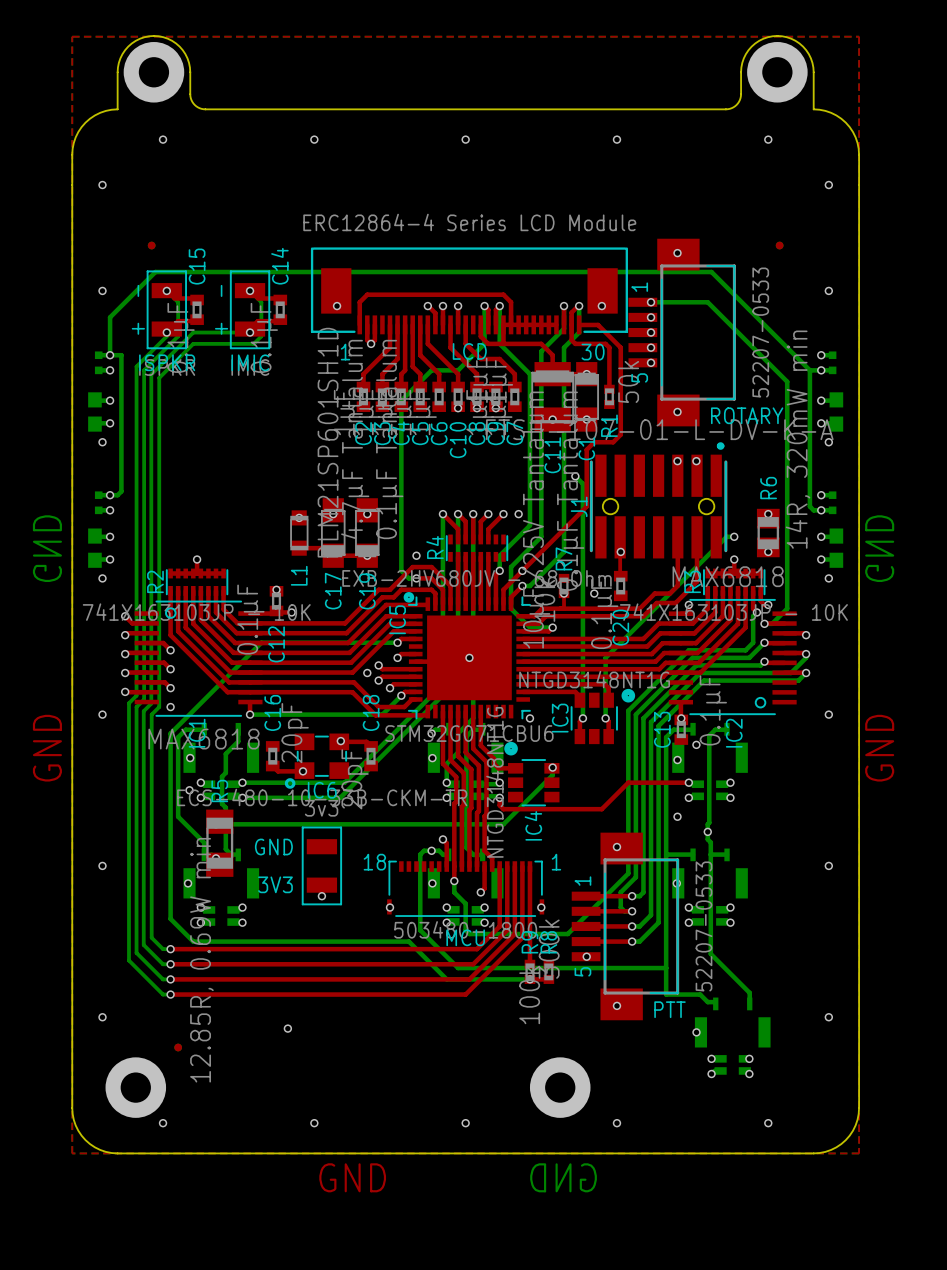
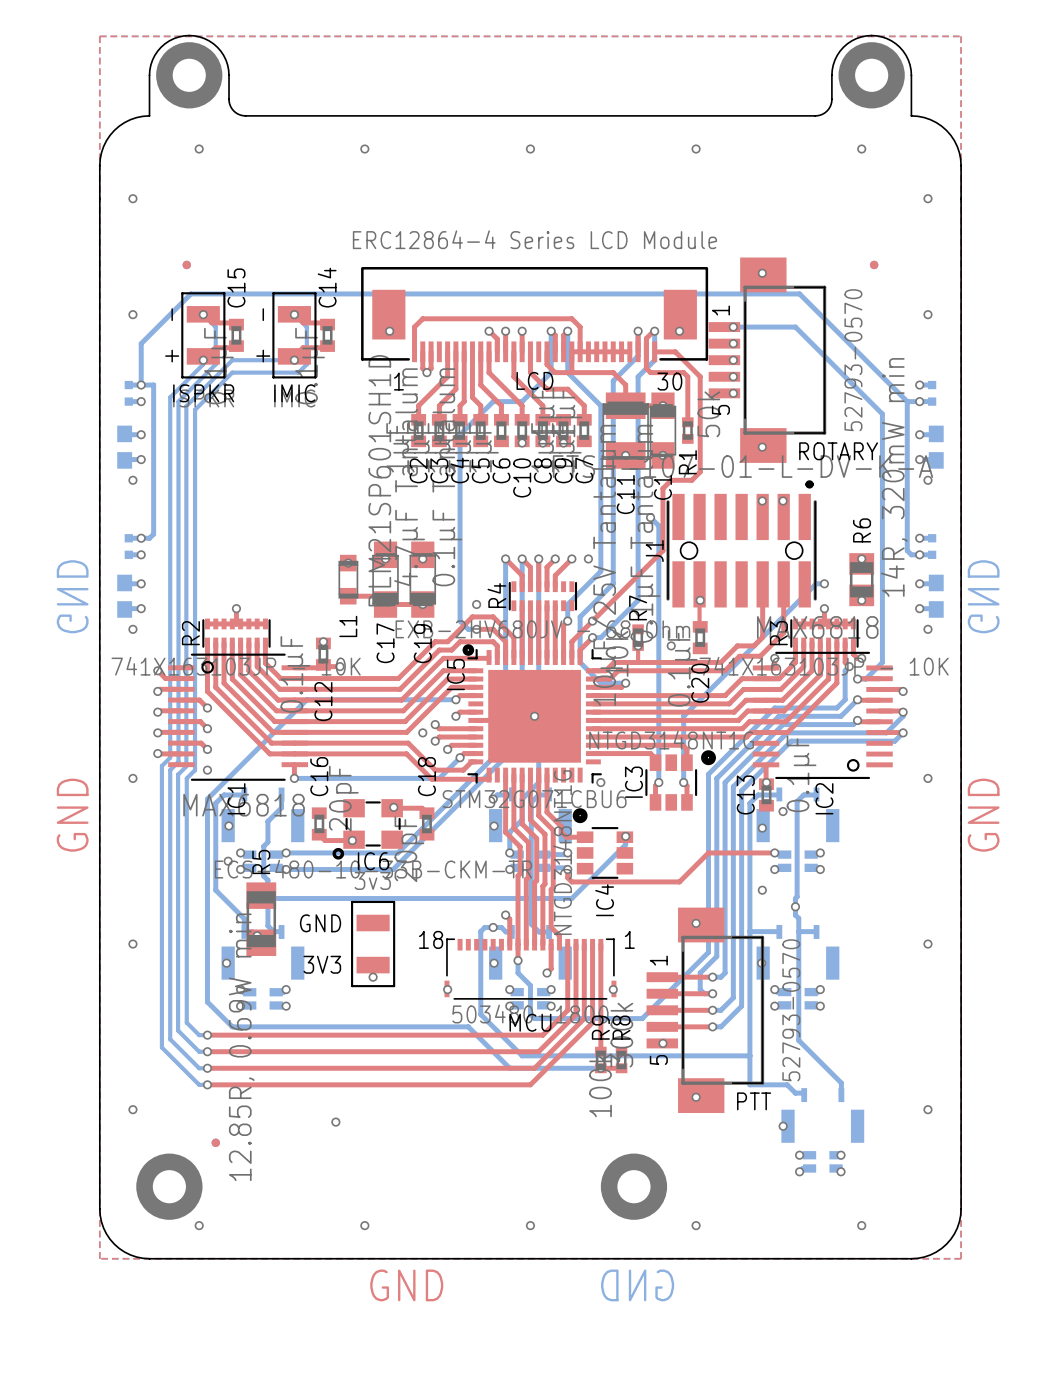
ROTARY value: 52207-0533 (760, 332) -> 52793-0570 (853, 360)
PTT value: 52207-0533 (703, 926) -> 52793-0570 (791, 1010)

